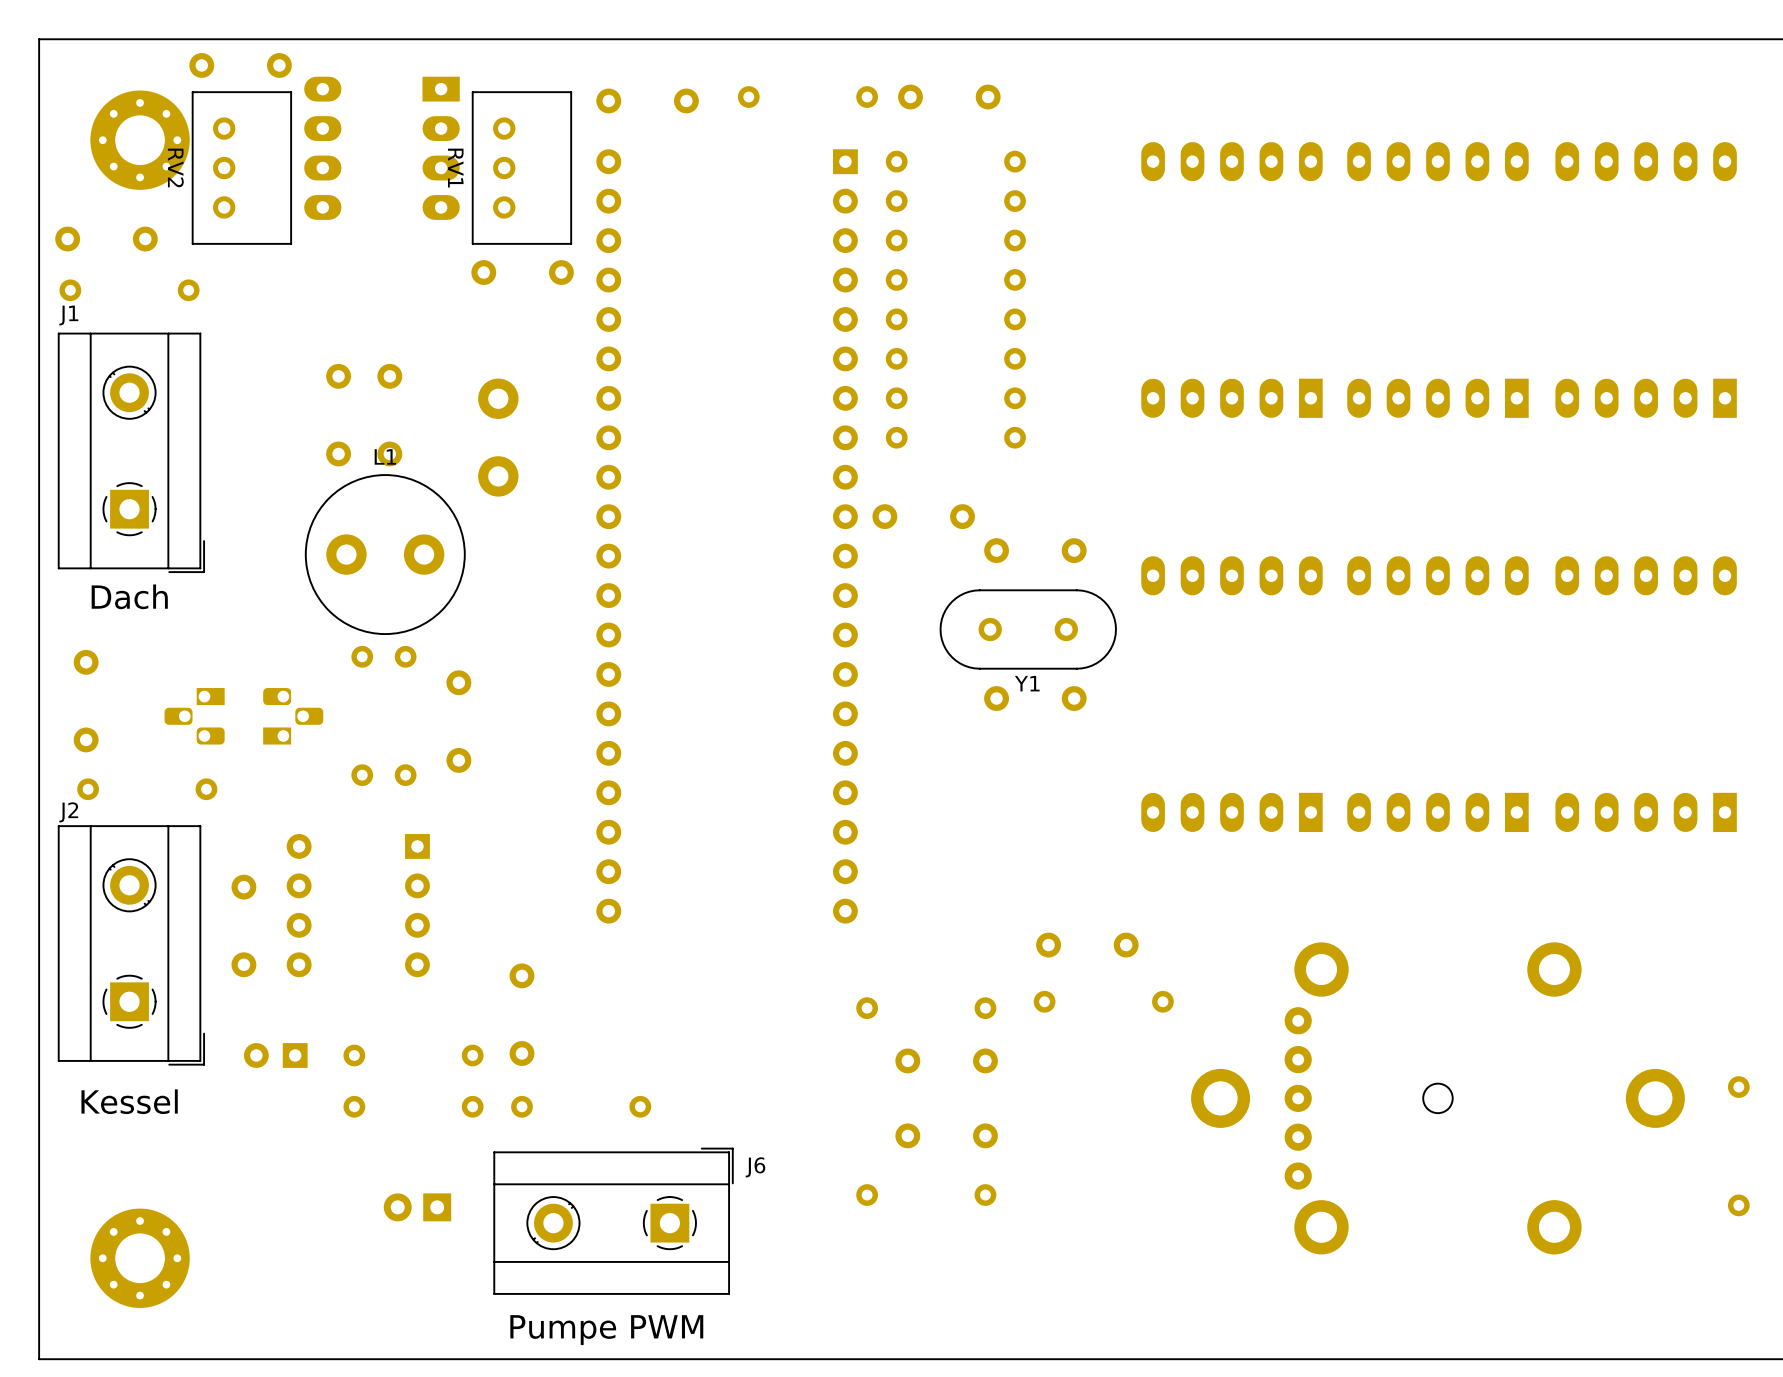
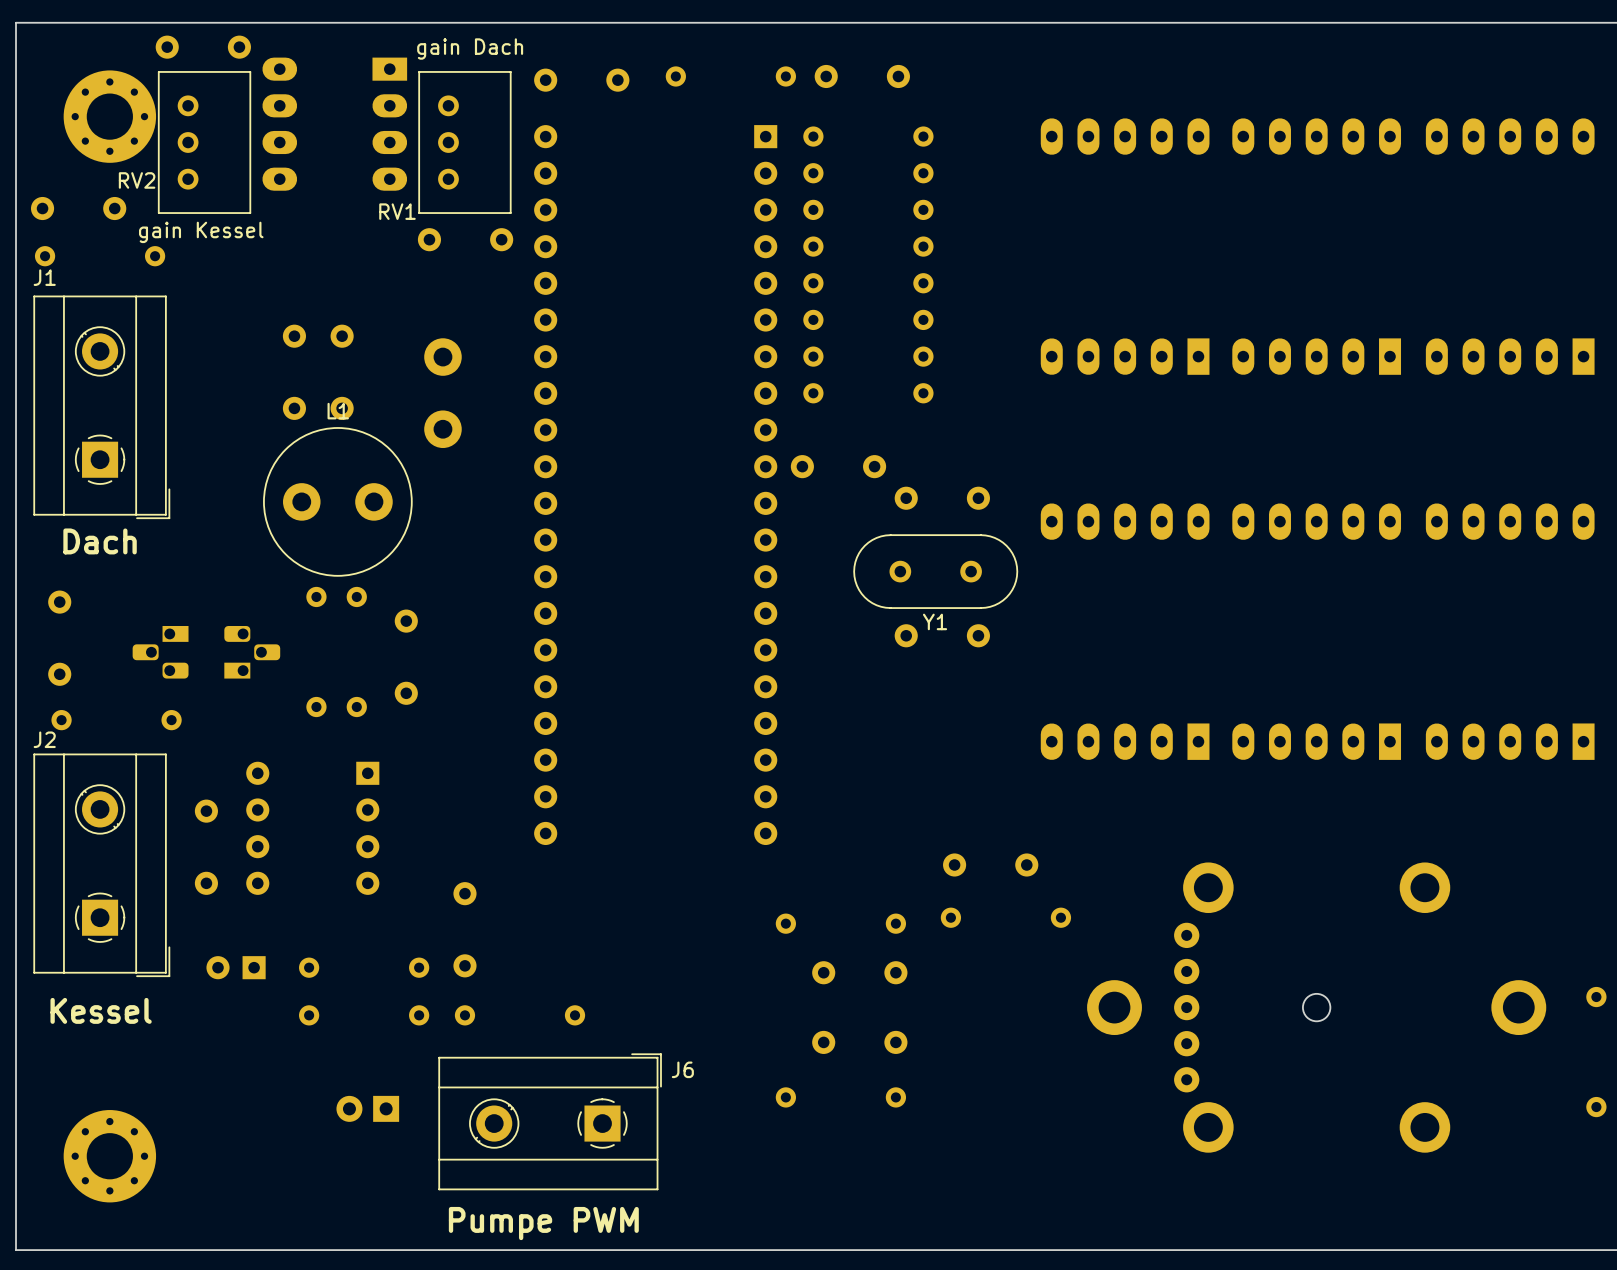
text: none -> gain Dach (470, 49)
RV2 name rotation: 0° (175, 167) -> 90° counterclockwise (137, 180)
RV1 name rotation: 0° (455, 168) -> 90° counterclockwise (397, 211)
RV1 name position: RV1 (455, 168) -> RV1 (397, 211)
text: none -> gain Kessel (201, 232)

